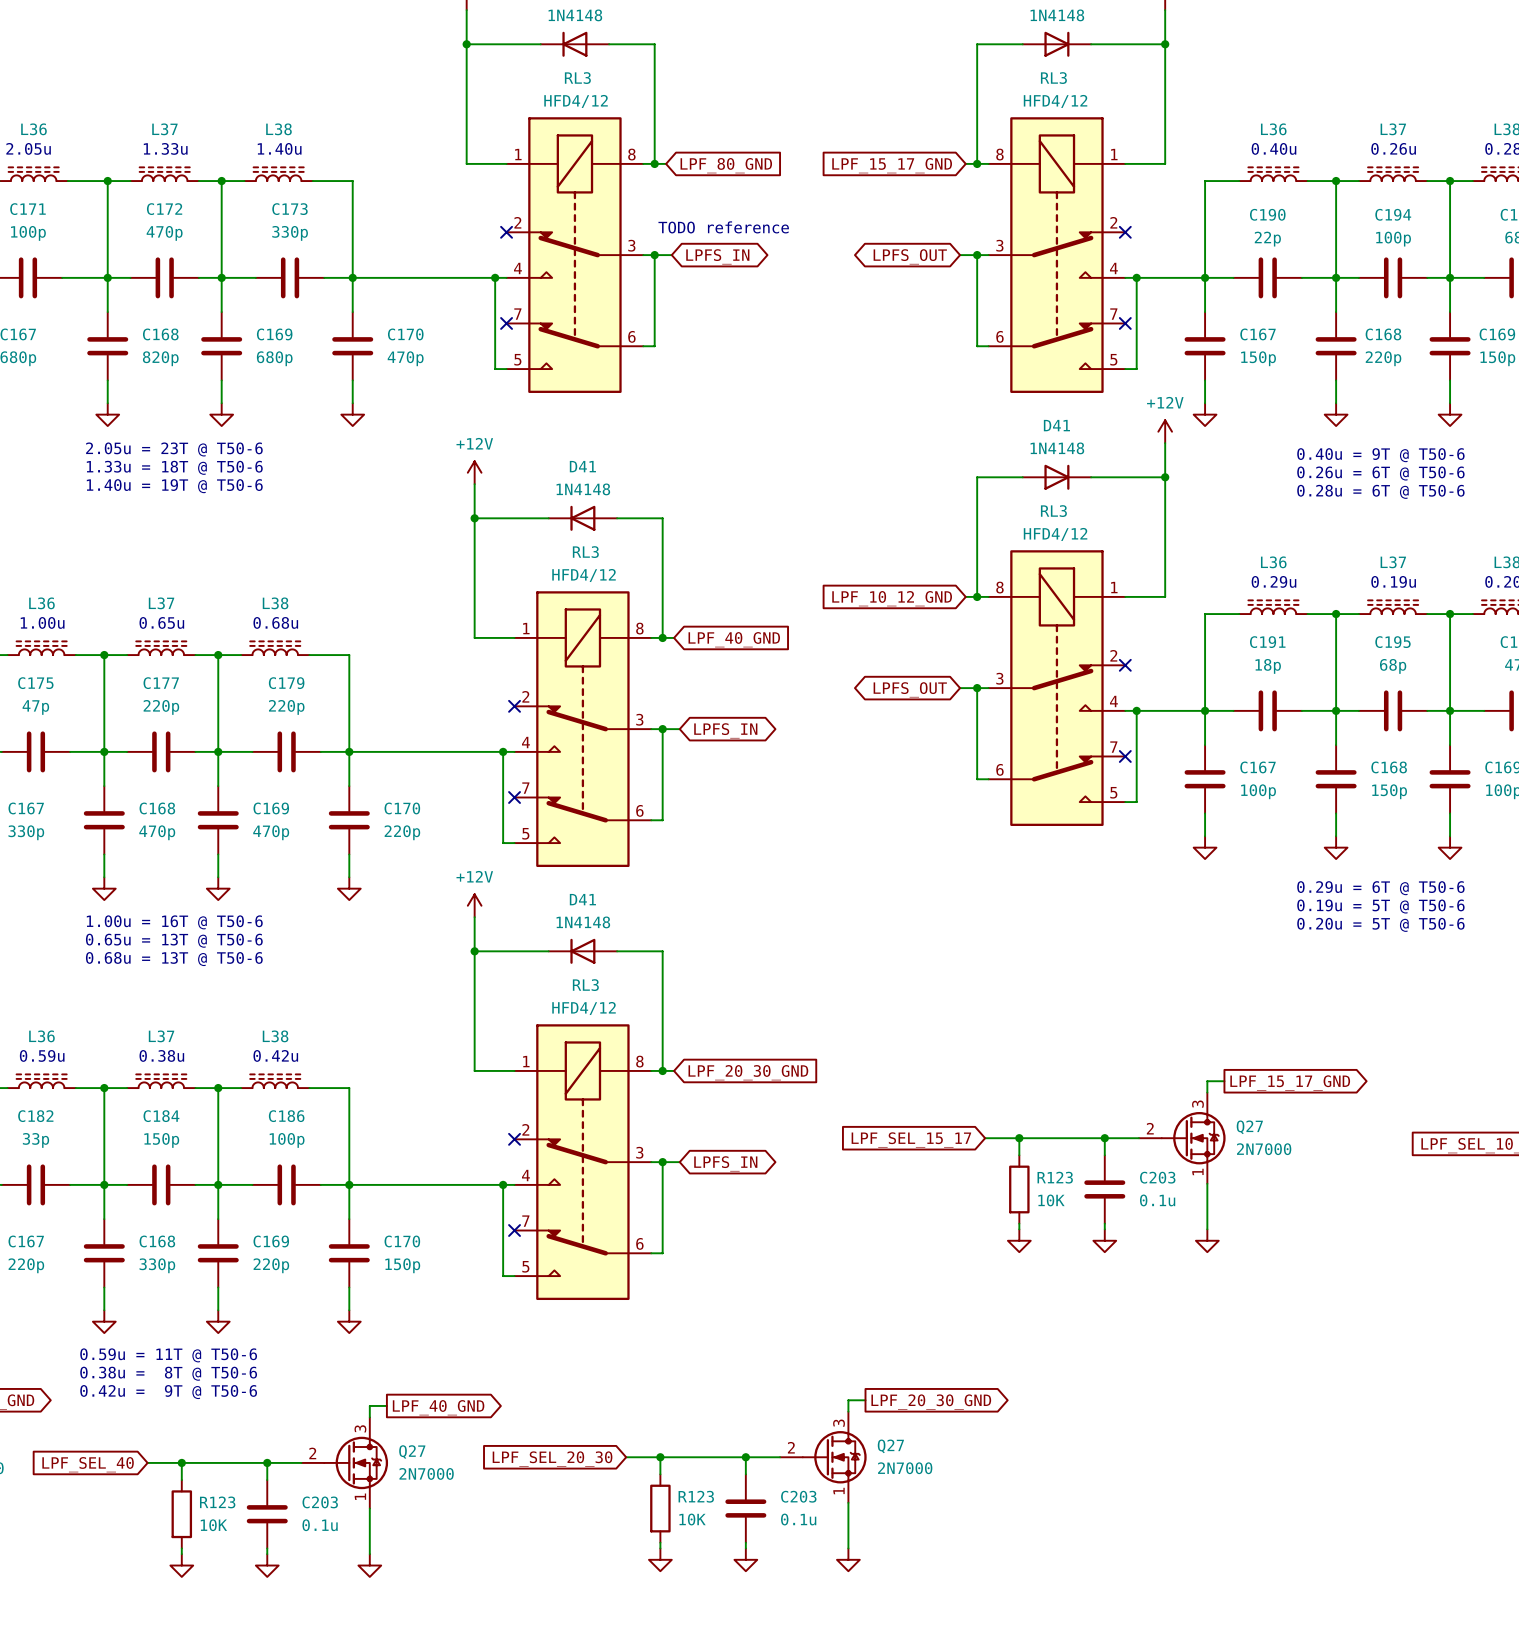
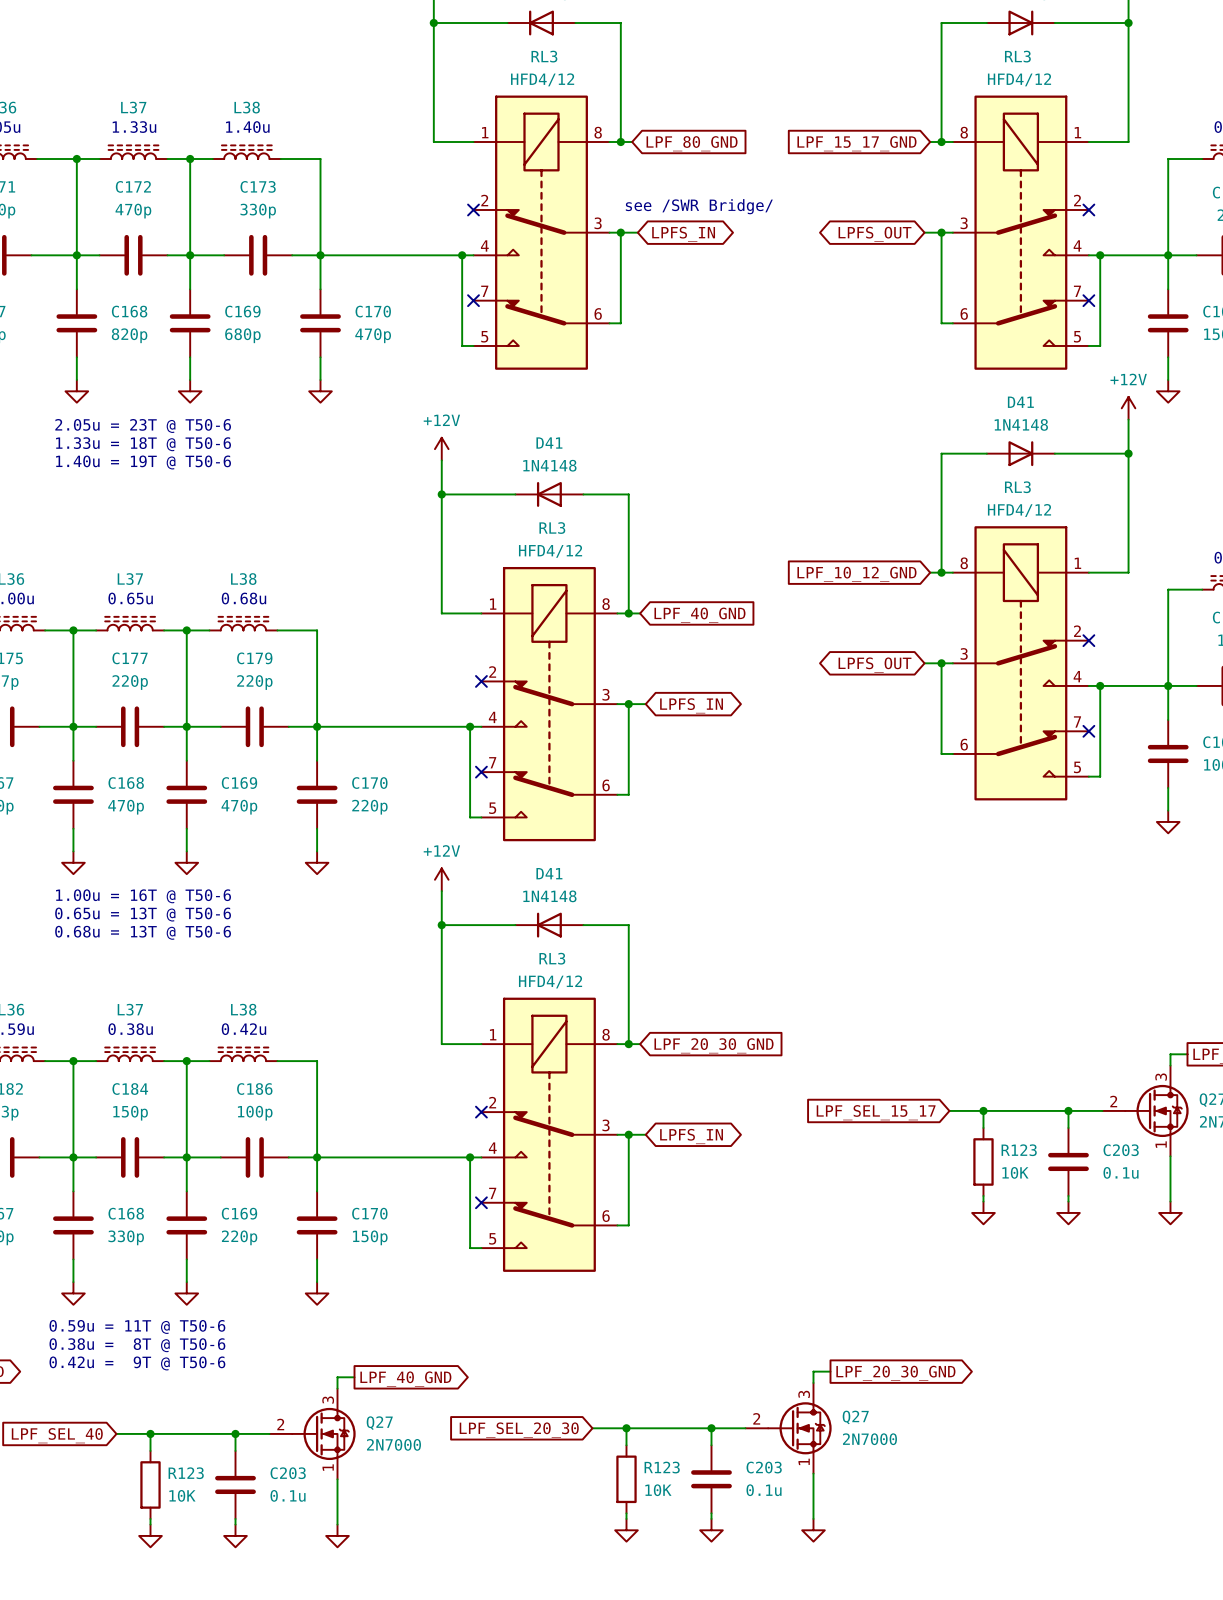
text: TODO reference (723, 227) -> see /SWR Bridge/ (699, 206)

